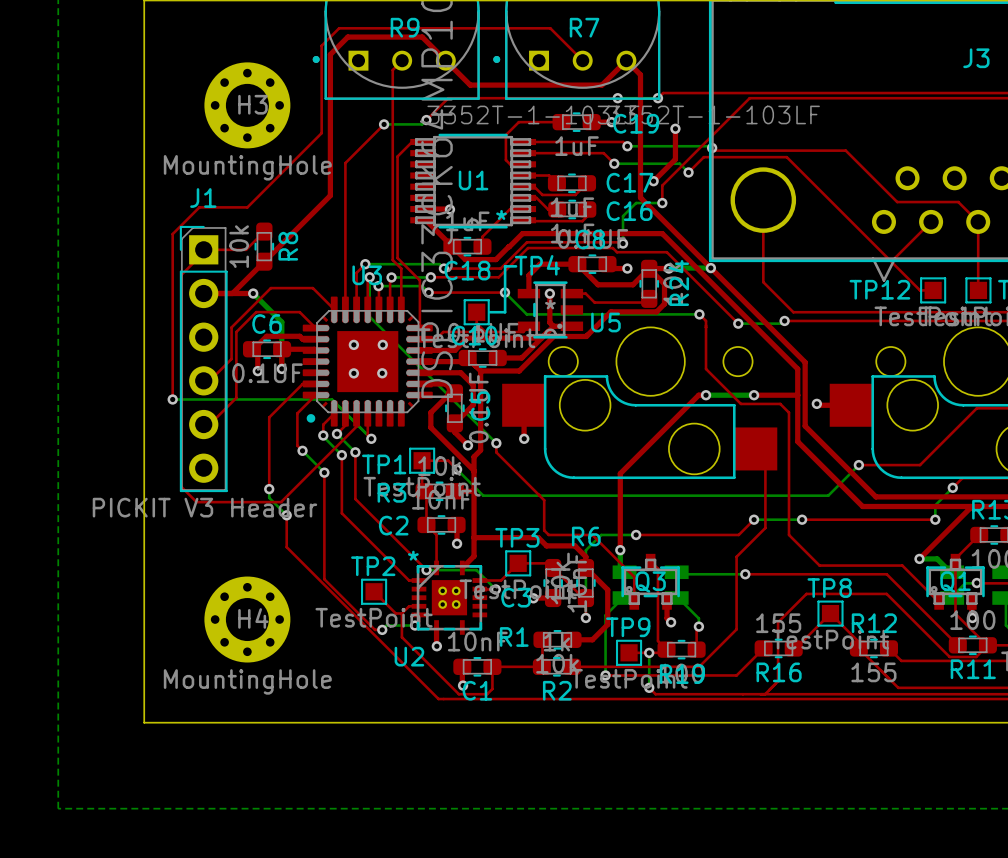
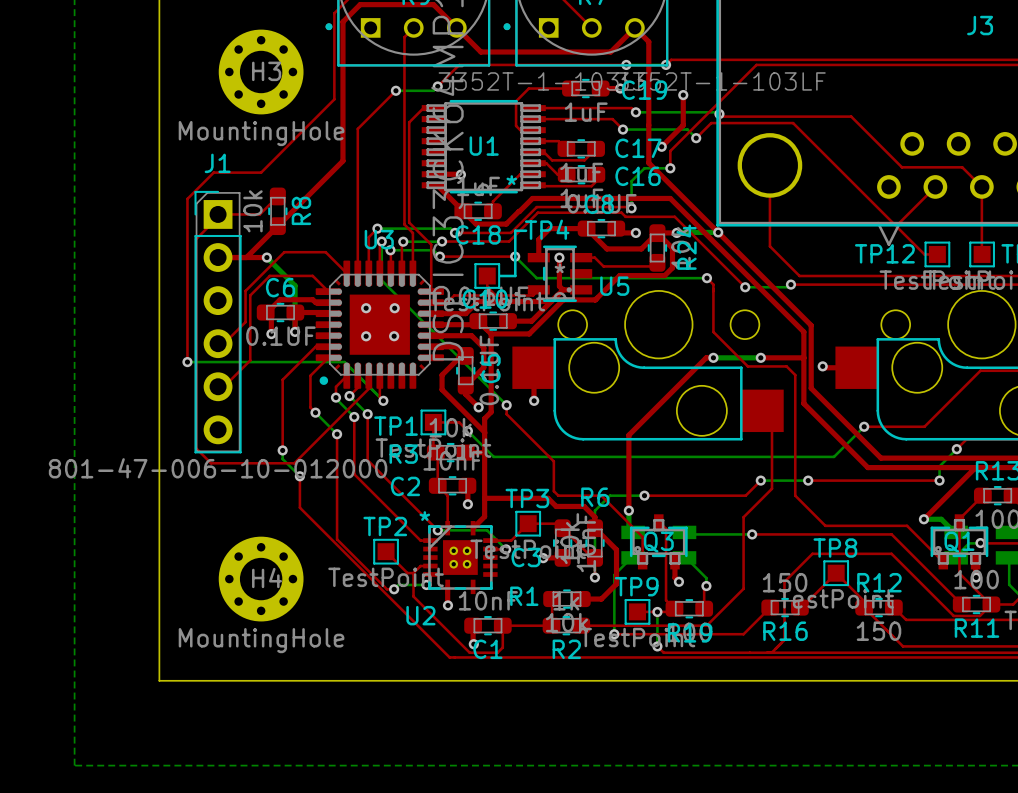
J1 value: PICKIT V3 Header (204, 507) -> 801-47-006-10-012000 (218, 468)
R16 value: 155 (778, 623) -> 150 (785, 582)
R12 value: 155 (873, 672) -> 150 (879, 631)

